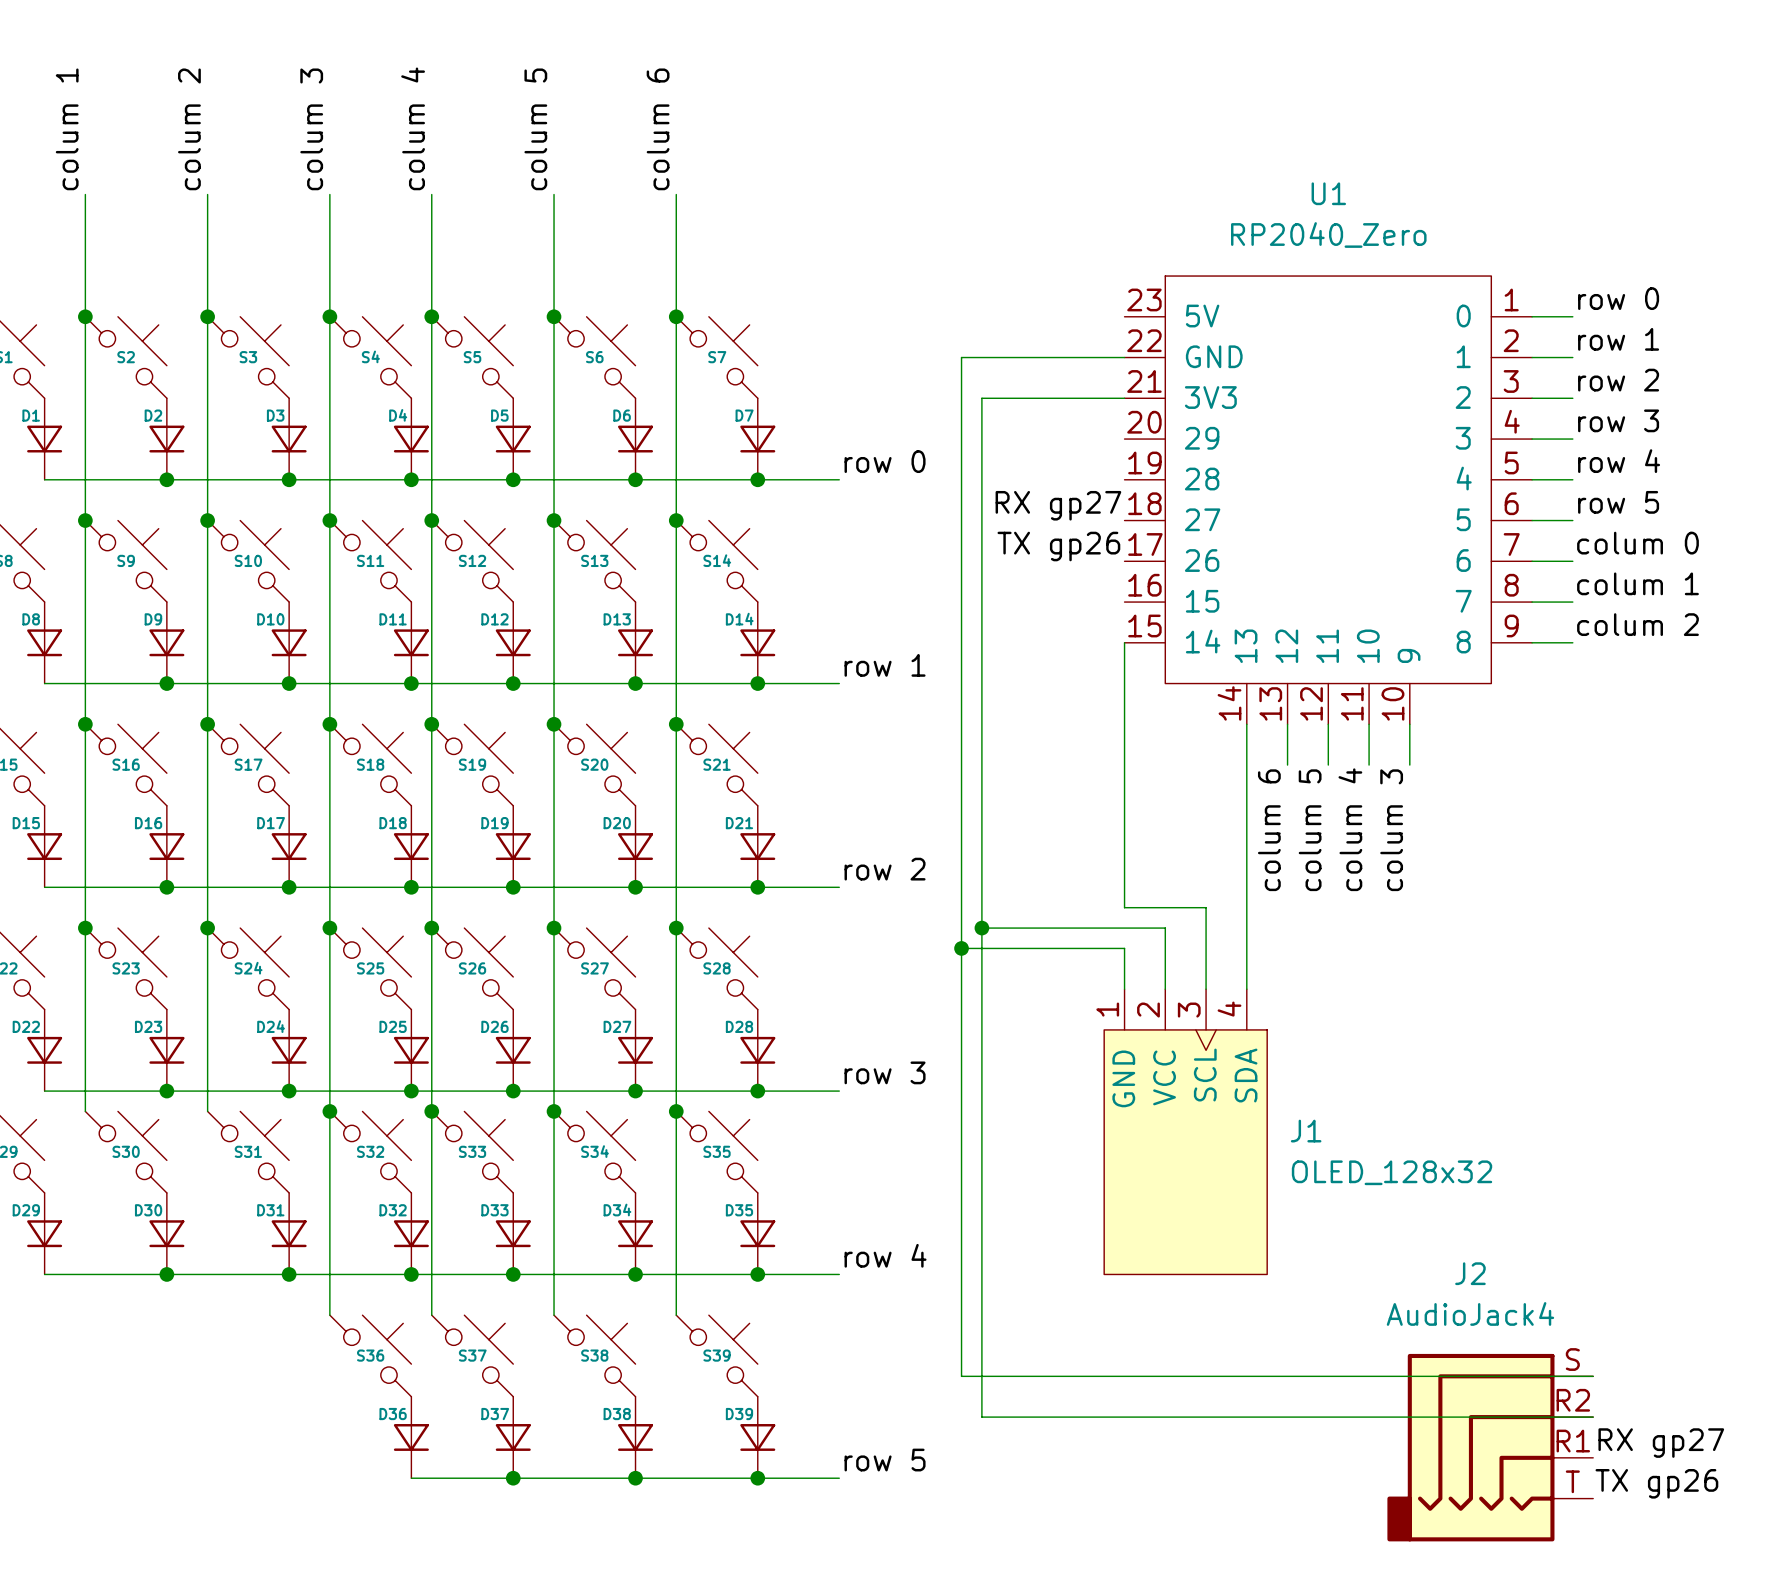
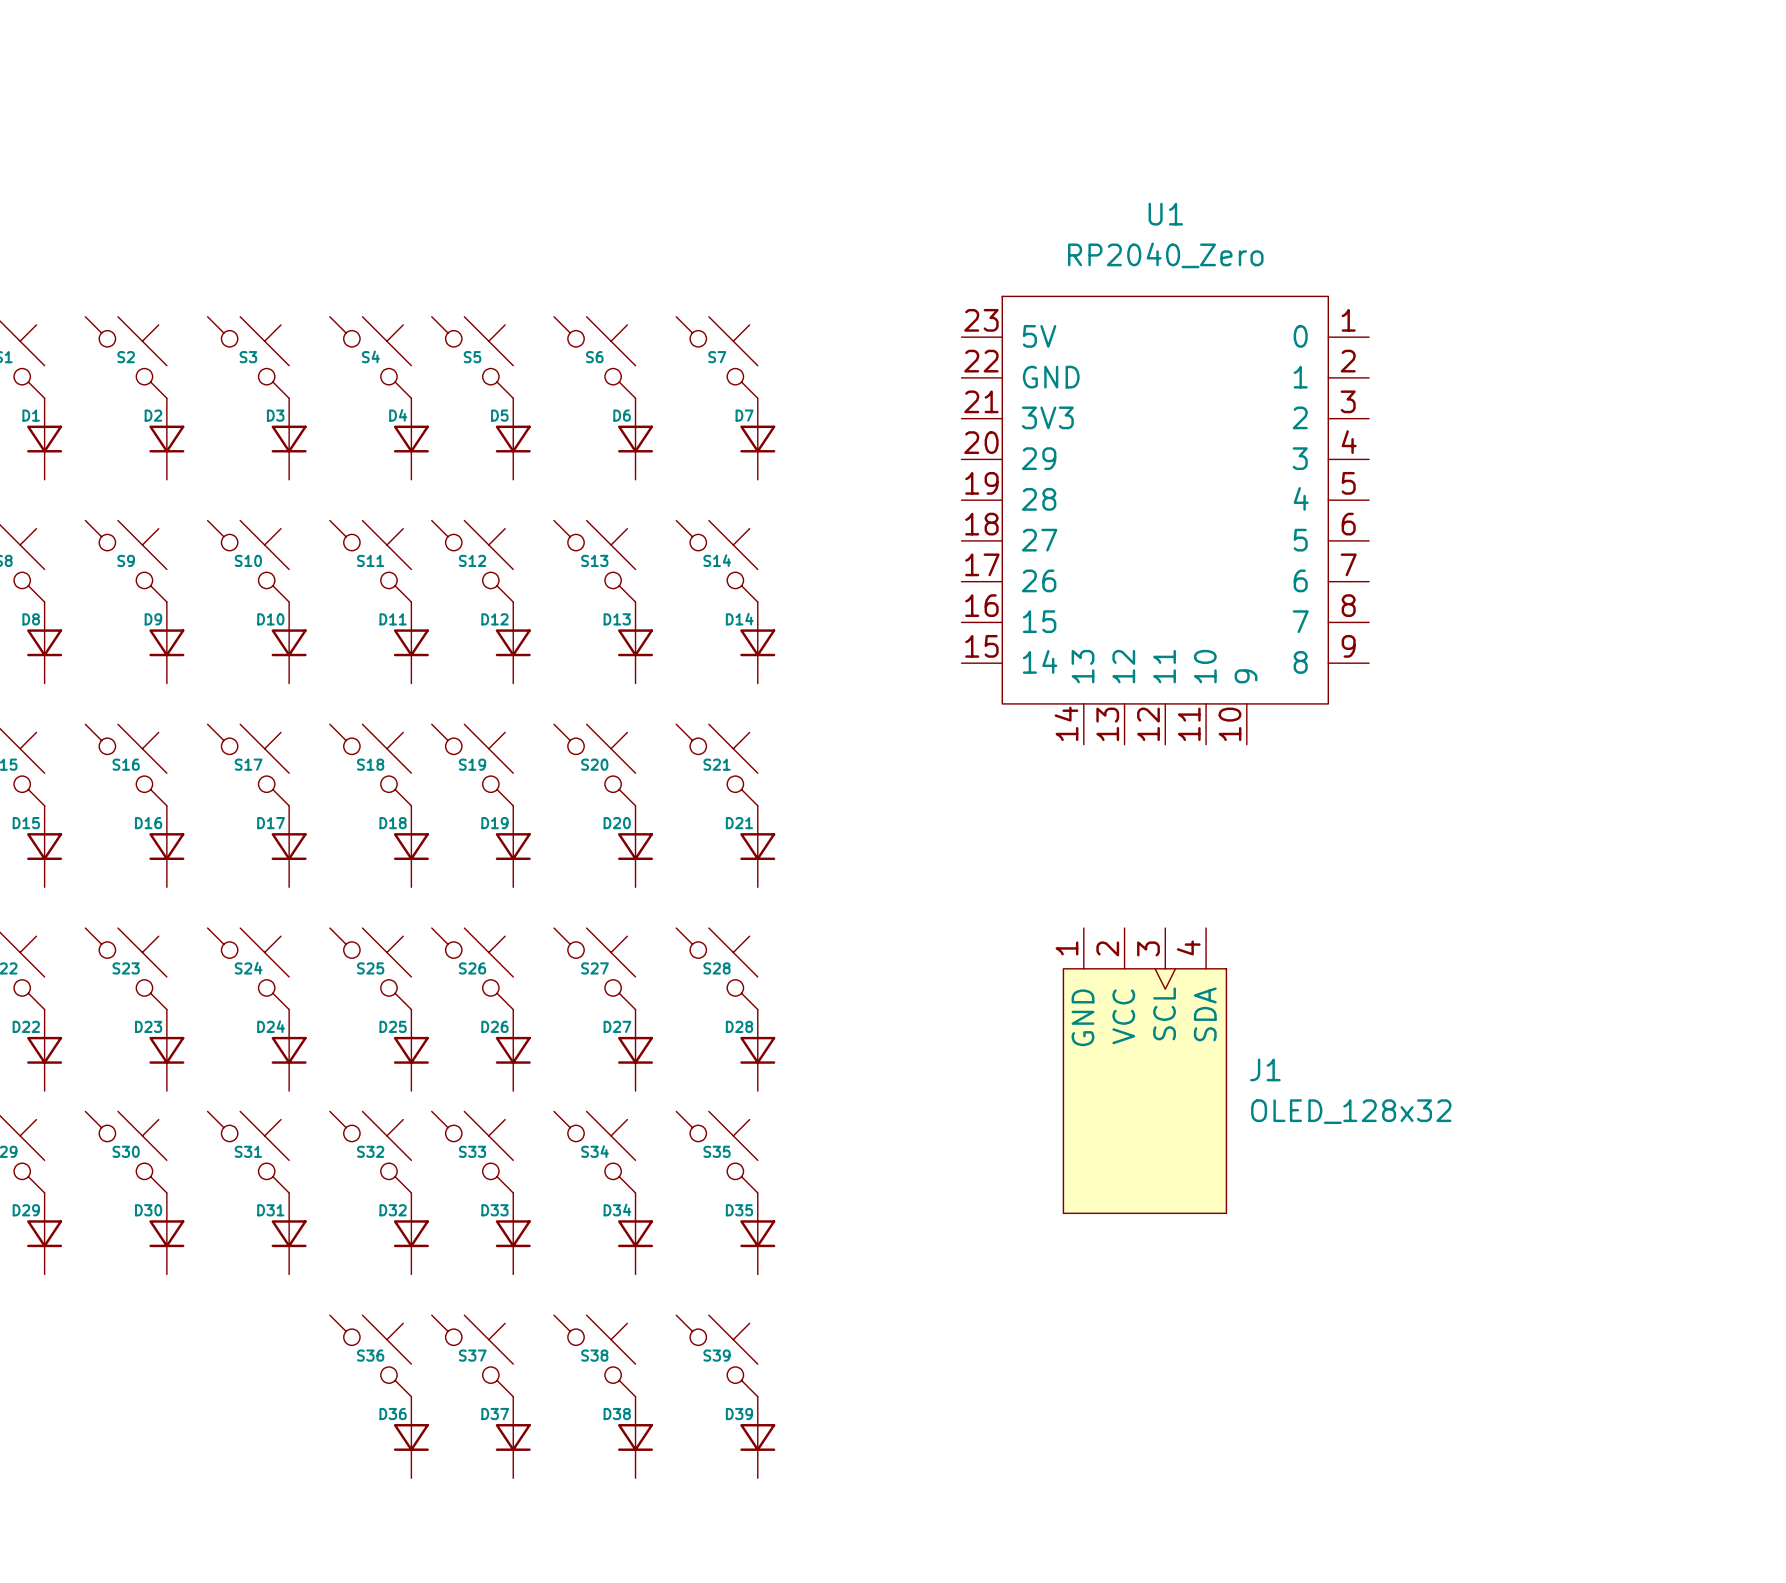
label: colum 4 (413, 128) -> none
label: colum 1 (67, 129) -> none
label: colum 2 (189, 129) -> none
label: colum 3 (311, 129) -> none
label: colum 5 (535, 129) -> none
label: colum 6 (658, 129) -> none
wire: (85, 194) (85, 1111) -> none
wire: (207, 194) (207, 1111) -> none
wire: (329, 194) (329, 1315) -> none
wire: (431, 194) (431, 1315) -> none
wire: (554, 194) (554, 1315) -> none
wire: (676, 194) (676, 1315) -> none
label: row 0 (1618, 298) -> none
junction: (85, 316) -> none
junction: (207, 316) -> none
junction: (329, 316) -> none
junction: (431, 316) -> none
junction: (554, 316) -> none
junction: (676, 316) -> none
wire: (1532, 316) (1572, 316) -> none
label: row 1 (1618, 339) -> none
wire: (1124, 357) (961, 357) (961, 1376) (1593, 1376) -> none
wire: (1532, 357) (1572, 357) -> none
label: row 2 (1618, 380) -> none
wire: (1124, 398) (981, 398) (981, 1417) (1593, 1417) -> none
wire: (1532, 398) (1572, 398) -> none
label: row 3 (1618, 420) -> none
wire: (1532, 439) (1572, 439) -> none
label: row 0 (885, 461) -> none
label: row 4 (1619, 461) -> none
wire: (44, 479) (839, 479) -> none
junction: (166, 479) -> none
junction: (289, 479) -> none
junction: (411, 479) -> none
junction: (513, 479) -> none
junction: (635, 479) -> none
junction: (757, 479) -> none
wire: (1532, 479) (1572, 479) -> none
U1 position: (1328, 500) -> (1165, 520)
label: row 5 (1618, 502) -> none
label: RX gp27 (1058, 505) -> none
junction: (85, 520) -> none
junction: (207, 520) -> none
junction: (329, 520) -> none
junction: (431, 520) -> none
junction: (554, 520) -> none
junction: (676, 520) -> none
wire: (1532, 520) (1572, 520) -> none
label: colum 0 (1637, 543) -> none
label: TX gp26 (1058, 546) -> none
wire: (1532, 561) (1572, 561) -> none
label: colum 1 (1637, 583) -> none
wire: (1532, 602) (1572, 602) -> none
label: colum 2 (1637, 624) -> none
wire: (1124, 642) (1124, 907) (1206, 907) (1206, 989) -> none
wire: (1532, 642) (1572, 642) -> none
label: row 1 (885, 665) -> none
wire: (44, 683) (839, 683) -> none
junction: (166, 683) -> none
junction: (289, 683) -> none
junction: (411, 683) -> none
junction: (513, 683) -> none
junction: (635, 683) -> none
junction: (757, 683) -> none
junction: (85, 724) -> none
junction: (207, 724) -> none
junction: (329, 724) -> none
junction: (431, 724) -> none
junction: (554, 724) -> none
junction: (676, 724) -> none
wire: (1246, 724) (1246, 989) -> none
wire: (1287, 724) (1287, 765) -> none
wire: (1328, 724) (1328, 765) -> none
wire: (1369, 724) (1369, 765) -> none
wire: (1409, 724) (1409, 765) -> none
label: colum 4 (1350, 829) -> none
label: colum 6 (1269, 830) -> none
label: colum 5 (1310, 830) -> none
label: colum 3 (1391, 830) -> none
label: row 2 (885, 869) -> none
wire: (44, 887) (839, 887) -> none
junction: (166, 887) -> none
junction: (289, 887) -> none
junction: (411, 887) -> none
junction: (513, 887) -> none
junction: (635, 887) -> none
junction: (757, 887) -> none
junction: (85, 928) -> none
junction: (207, 928) -> none
junction: (329, 928) -> none
junction: (431, 928) -> none
junction: (554, 928) -> none
junction: (676, 928) -> none
wire: (981, 928) (1165, 928) (1165, 989) -> none
junction: (981, 928) -> none
wire: (961, 948) (1124, 948) (1124, 989) -> none
junction: (961, 948) -> none
label: row 3 (885, 1072) -> none
wire: (44, 1091) (839, 1091) -> none
junction: (166, 1091) -> none
junction: (289, 1091) -> none
junction: (411, 1091) -> none
junction: (513, 1091) -> none
junction: (635, 1091) -> none
junction: (757, 1091) -> none
junction: (329, 1111) -> none
junction: (431, 1111) -> none
junction: (554, 1111) -> none
junction: (676, 1111) -> none
J1 position: (1185, 1131) -> (1144, 1070)
label: row 4 (885, 1255) -> none
wire: (44, 1274) (839, 1274) -> none
junction: (166, 1274) -> none
junction: (289, 1274) -> none
junction: (411, 1274) -> none
junction: (513, 1274) -> none
junction: (635, 1274) -> none
junction: (757, 1274) -> none
label: RX gp27 (1661, 1443) -> none
J2: AudioJack4 (1490, 1447) -> none
label: row 5 (885, 1460) -> none
wire: (411, 1478) (839, 1478) -> none
junction: (513, 1478) -> none
junction: (635, 1478) -> none
junction: (757, 1478) -> none
label: TX gp26 (1656, 1483) -> none

